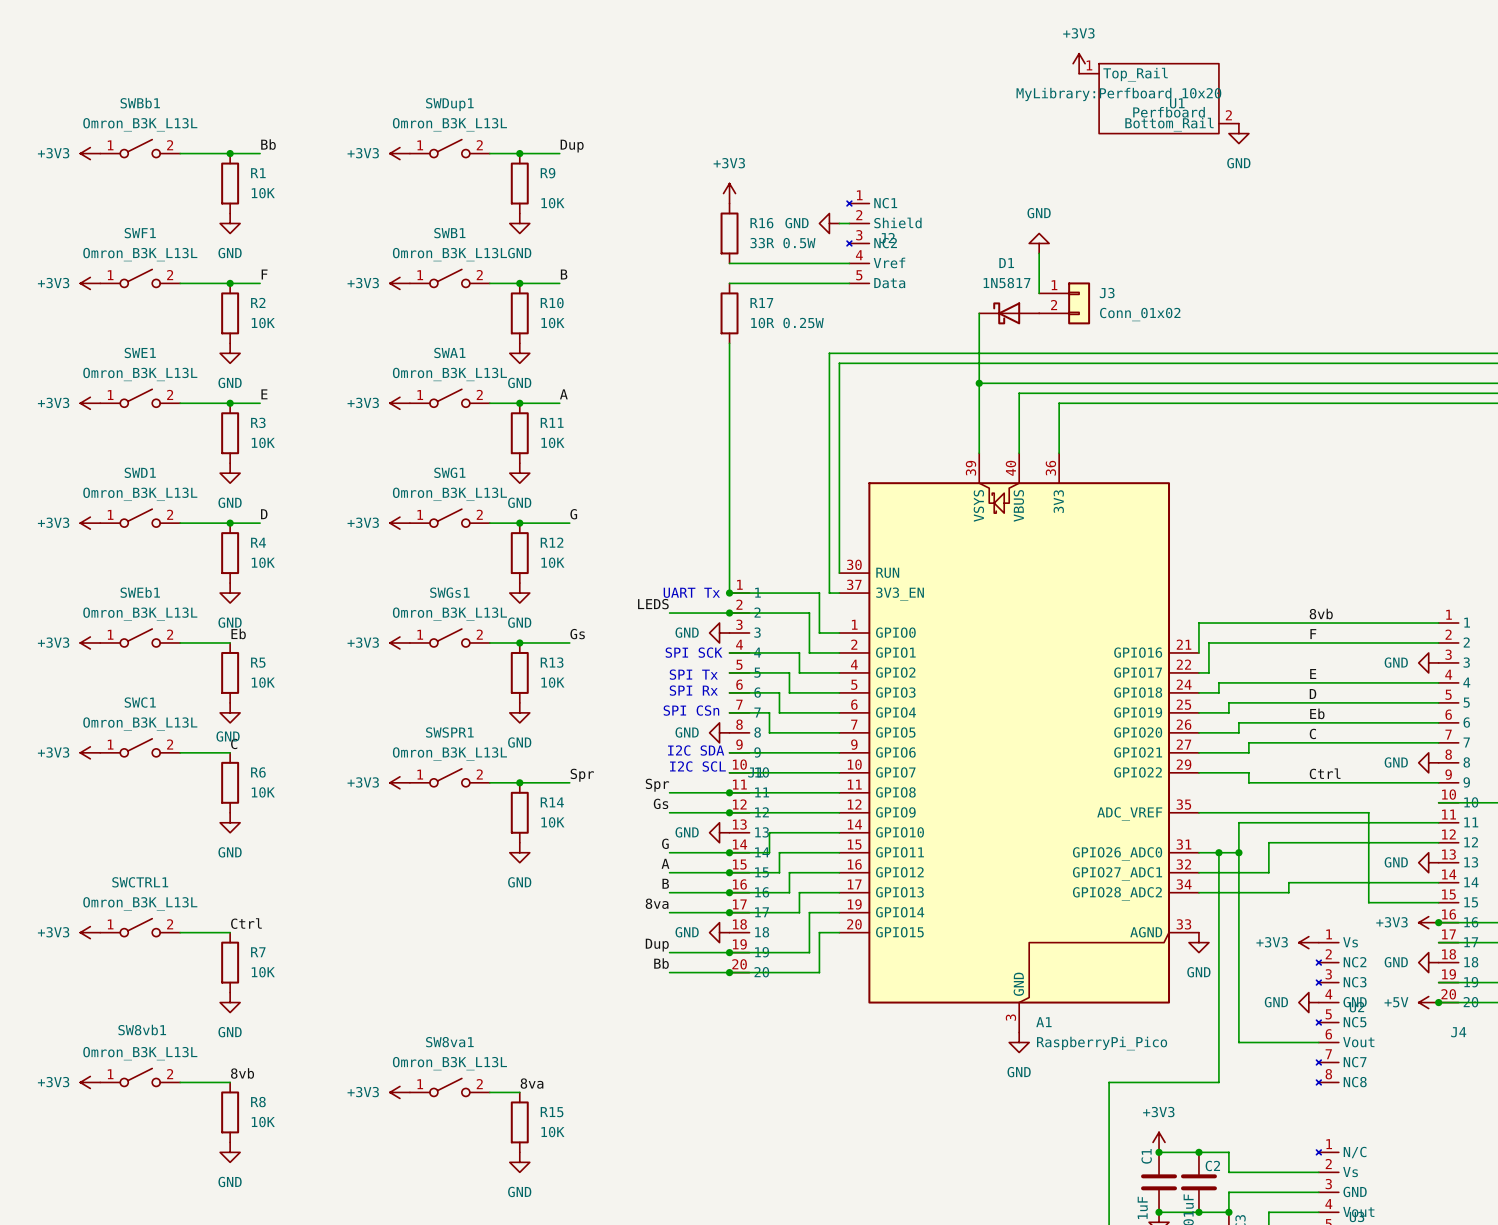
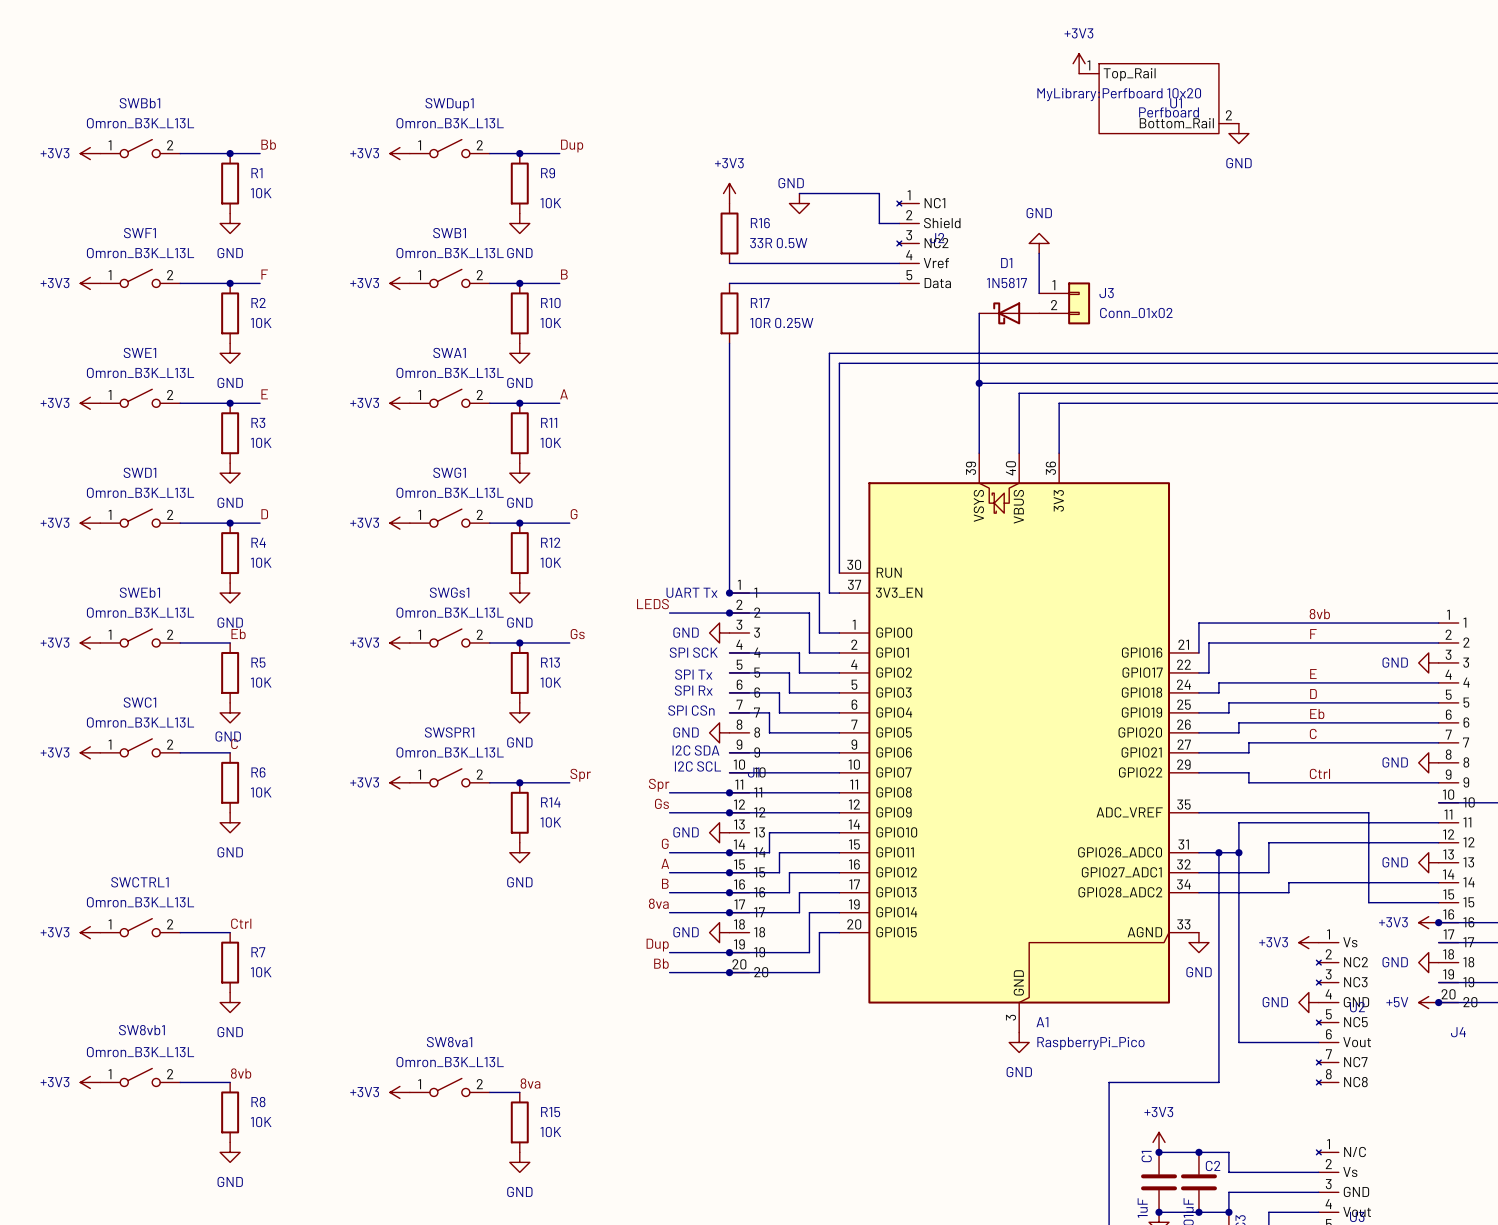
wire: none -> (799, 193) (879, 193) (879, 223) (899, 223)
power symbol text position: GND (796, 223) -> GND (791, 183)
power symbol rotation: 0° (829, 223) -> 90° counterclockwise (799, 203)
power symbol position: GND (829, 223) -> GND (799, 203)
wire: (839, 223) (849, 223) -> none
J2 position: (858, 242) -> (908, 242)

